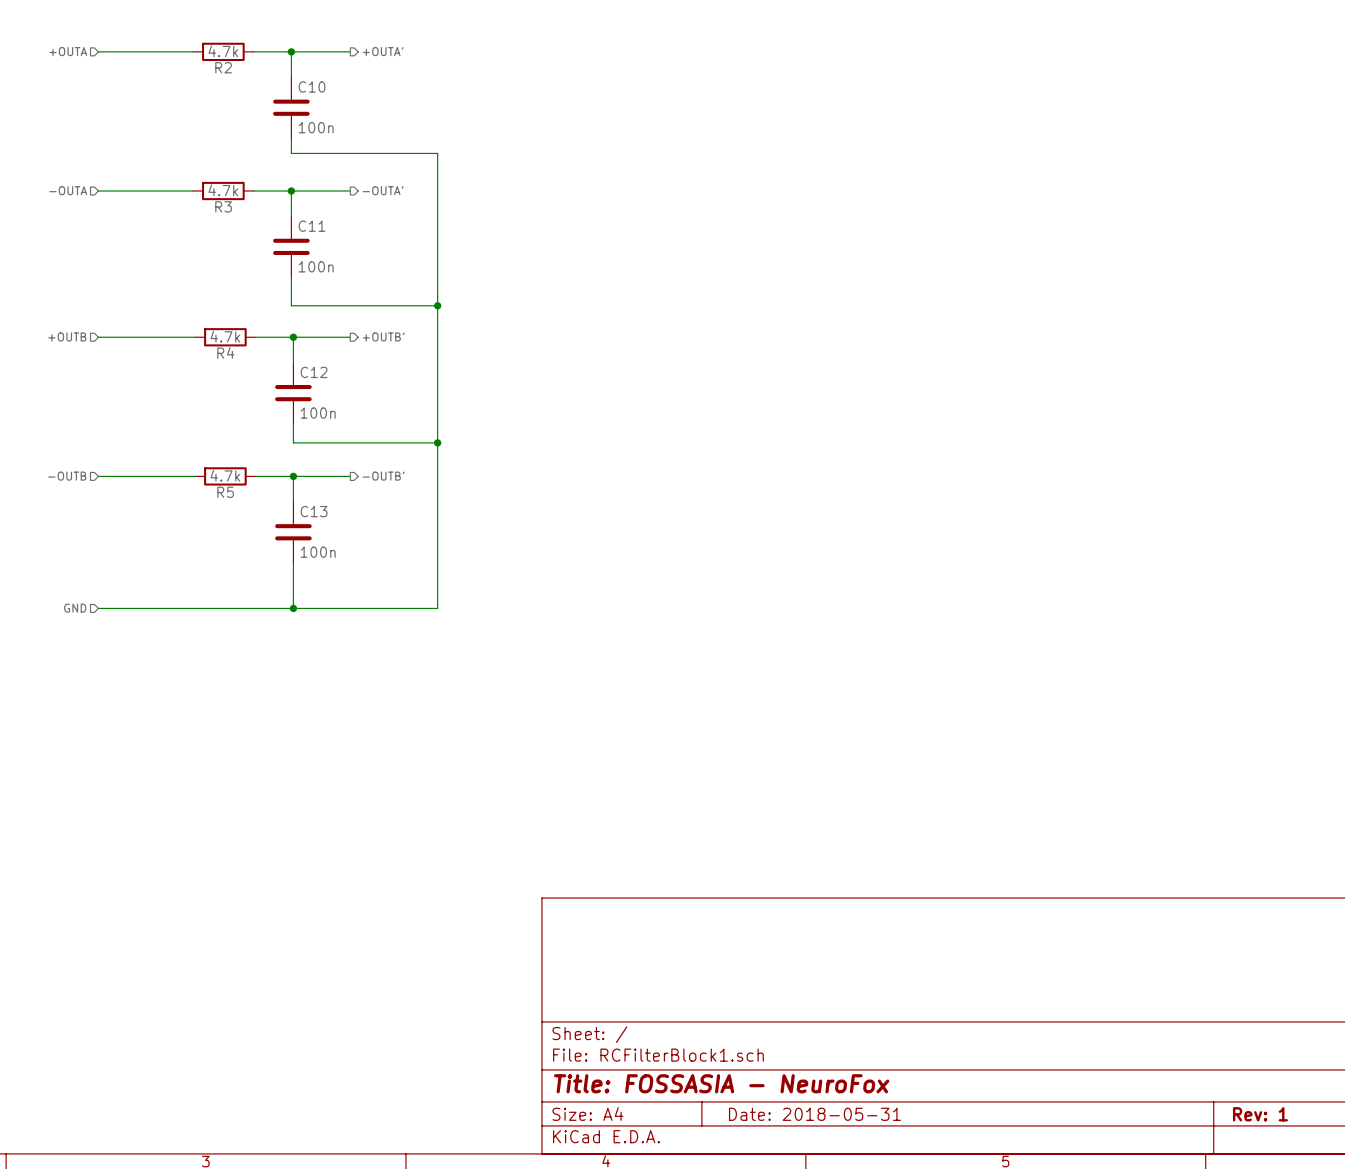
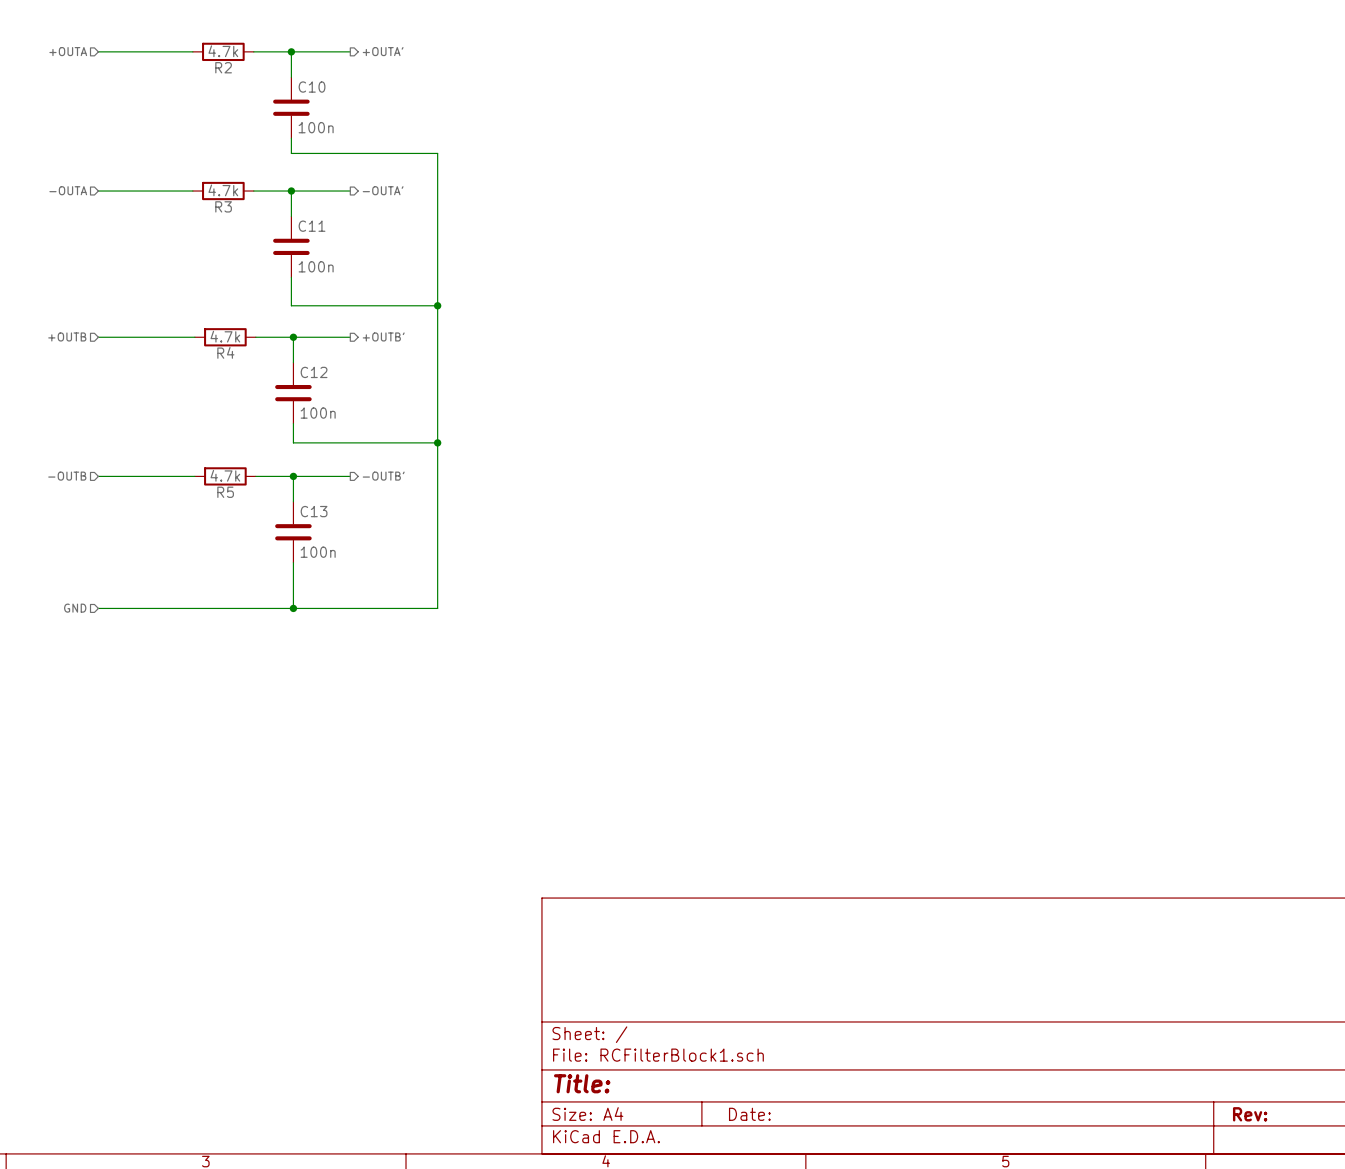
title block: Title: FOSSASIA - NeuroFox (721, 1083) -> Title: (582, 1083)
title block: Date: 2018-05-31 (814, 1114) -> Date: (749, 1114)
title block: Rev: 1 (1260, 1114) -> Rev: (1250, 1114)

